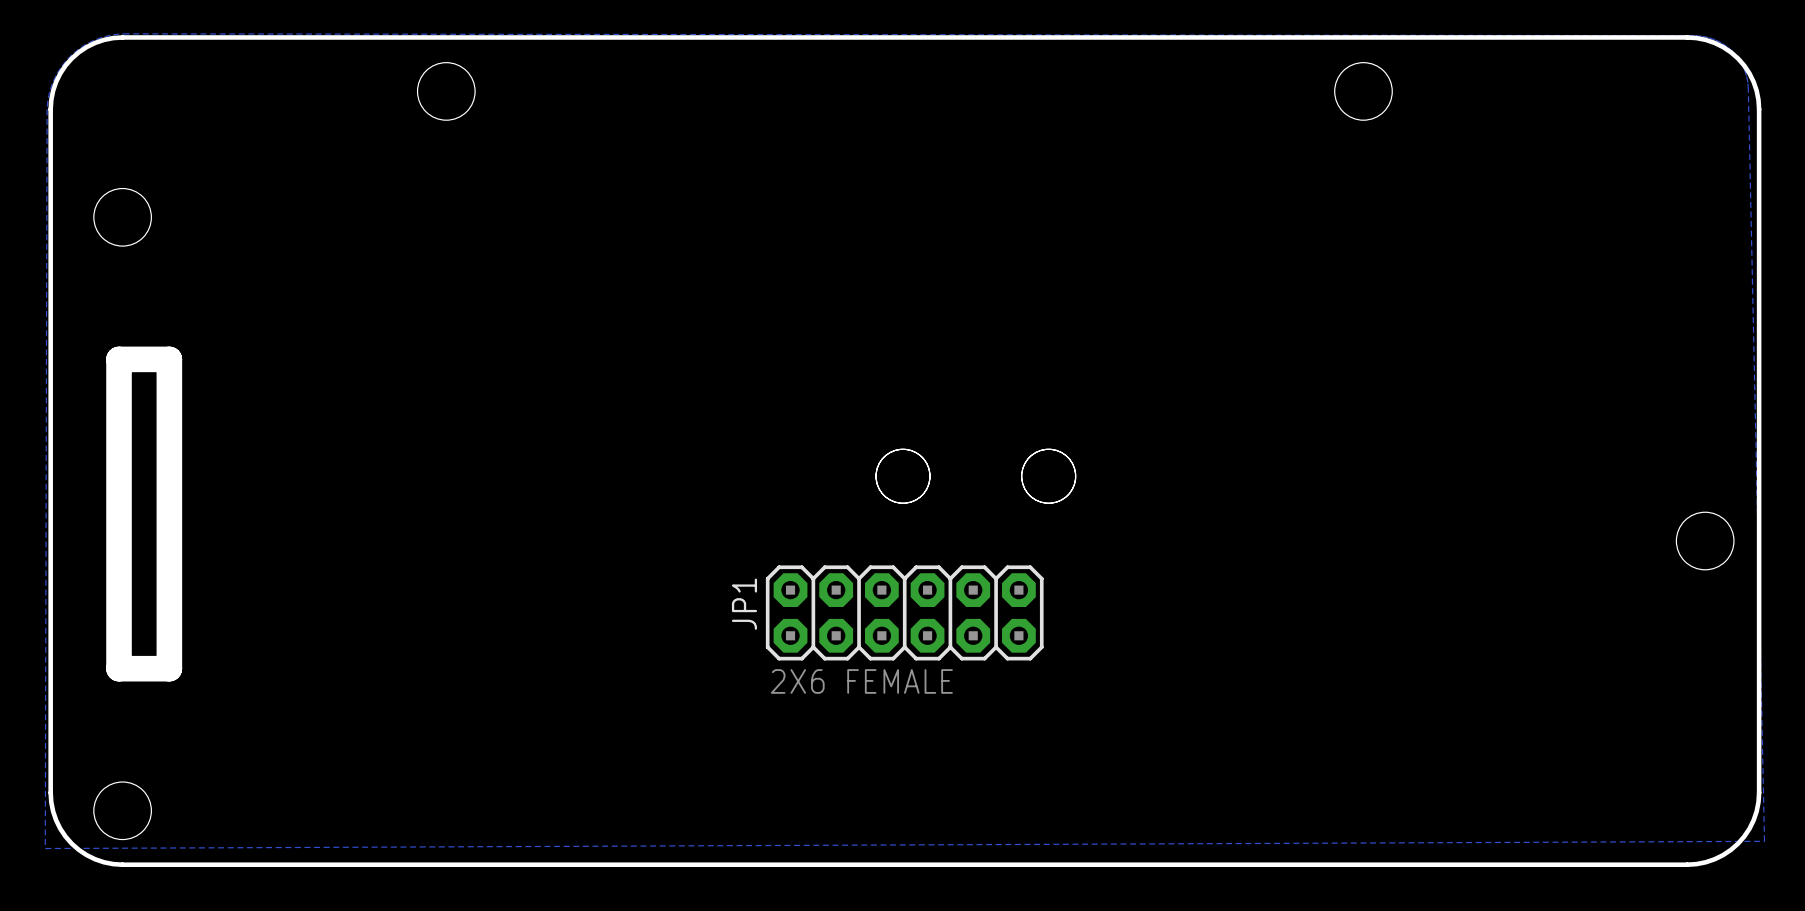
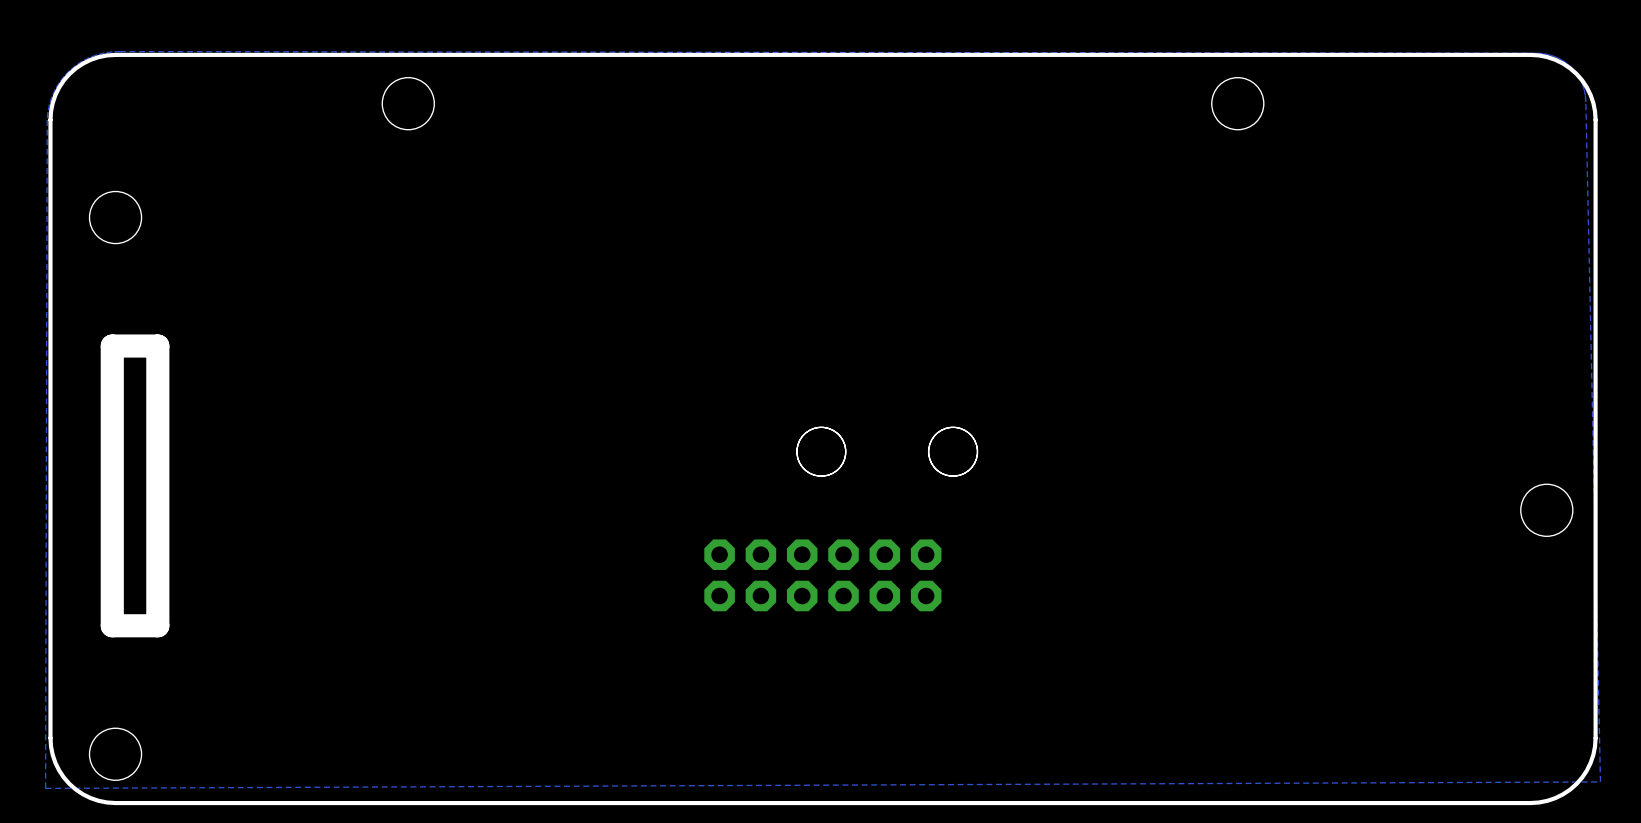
JP1 side: bottom (904, 612) -> top (822, 575)

